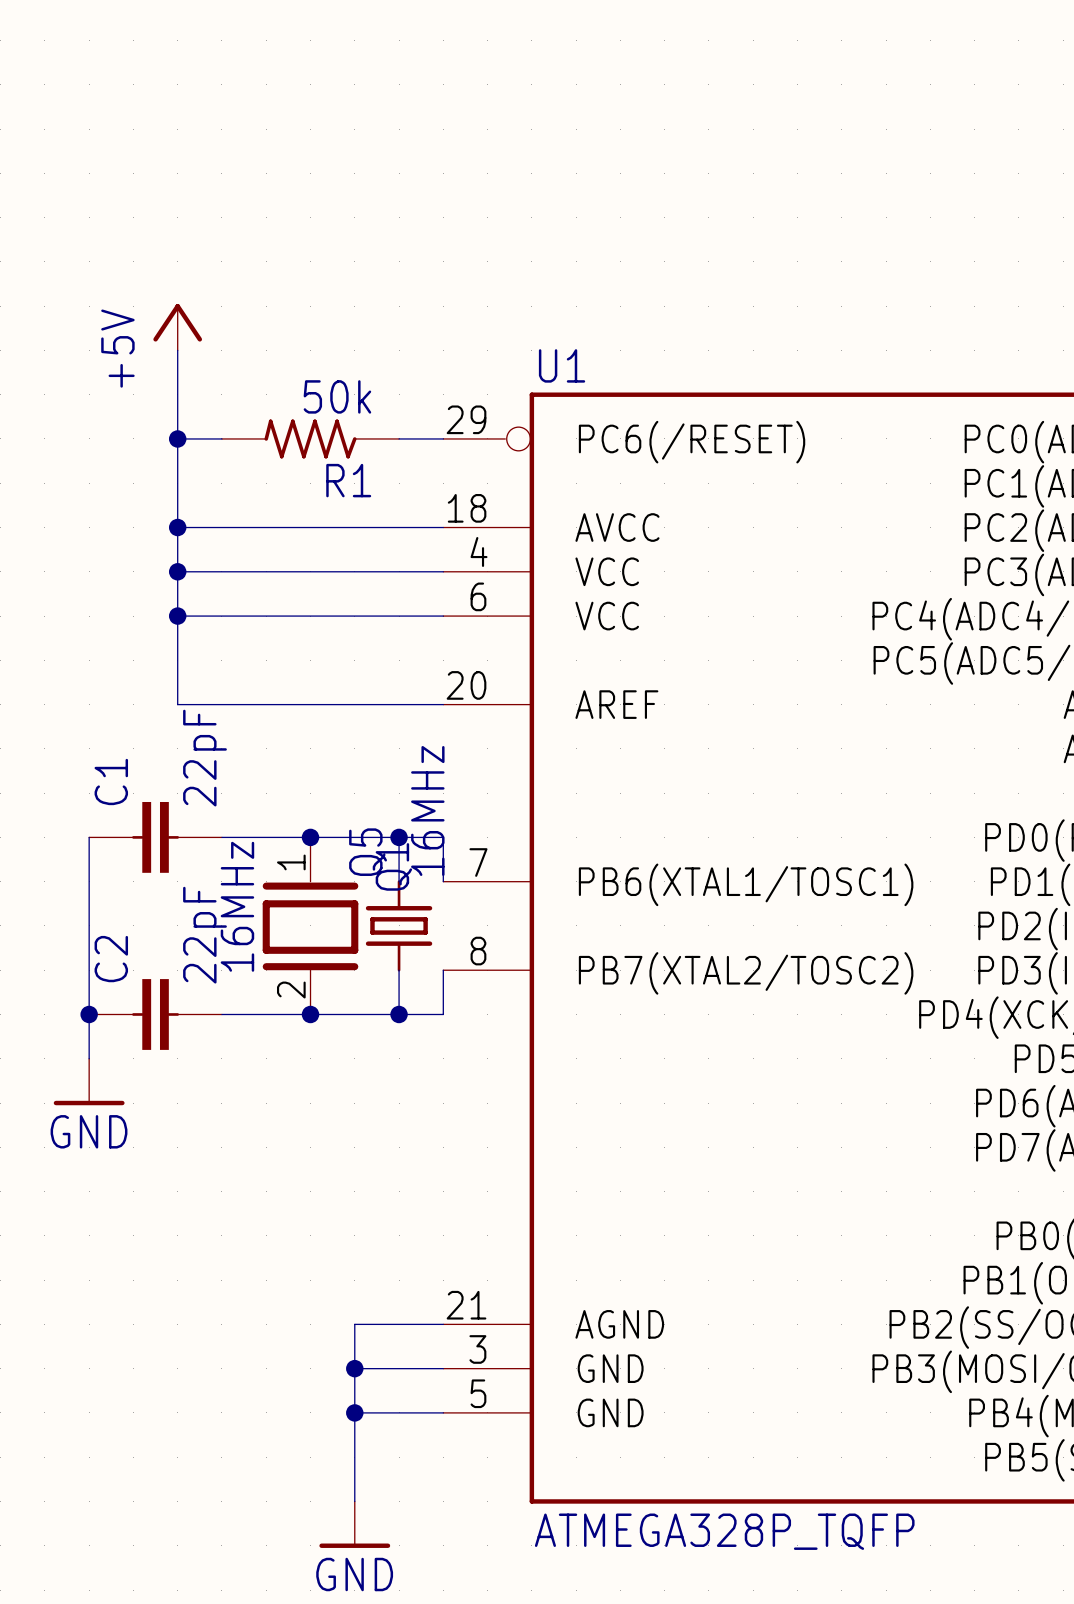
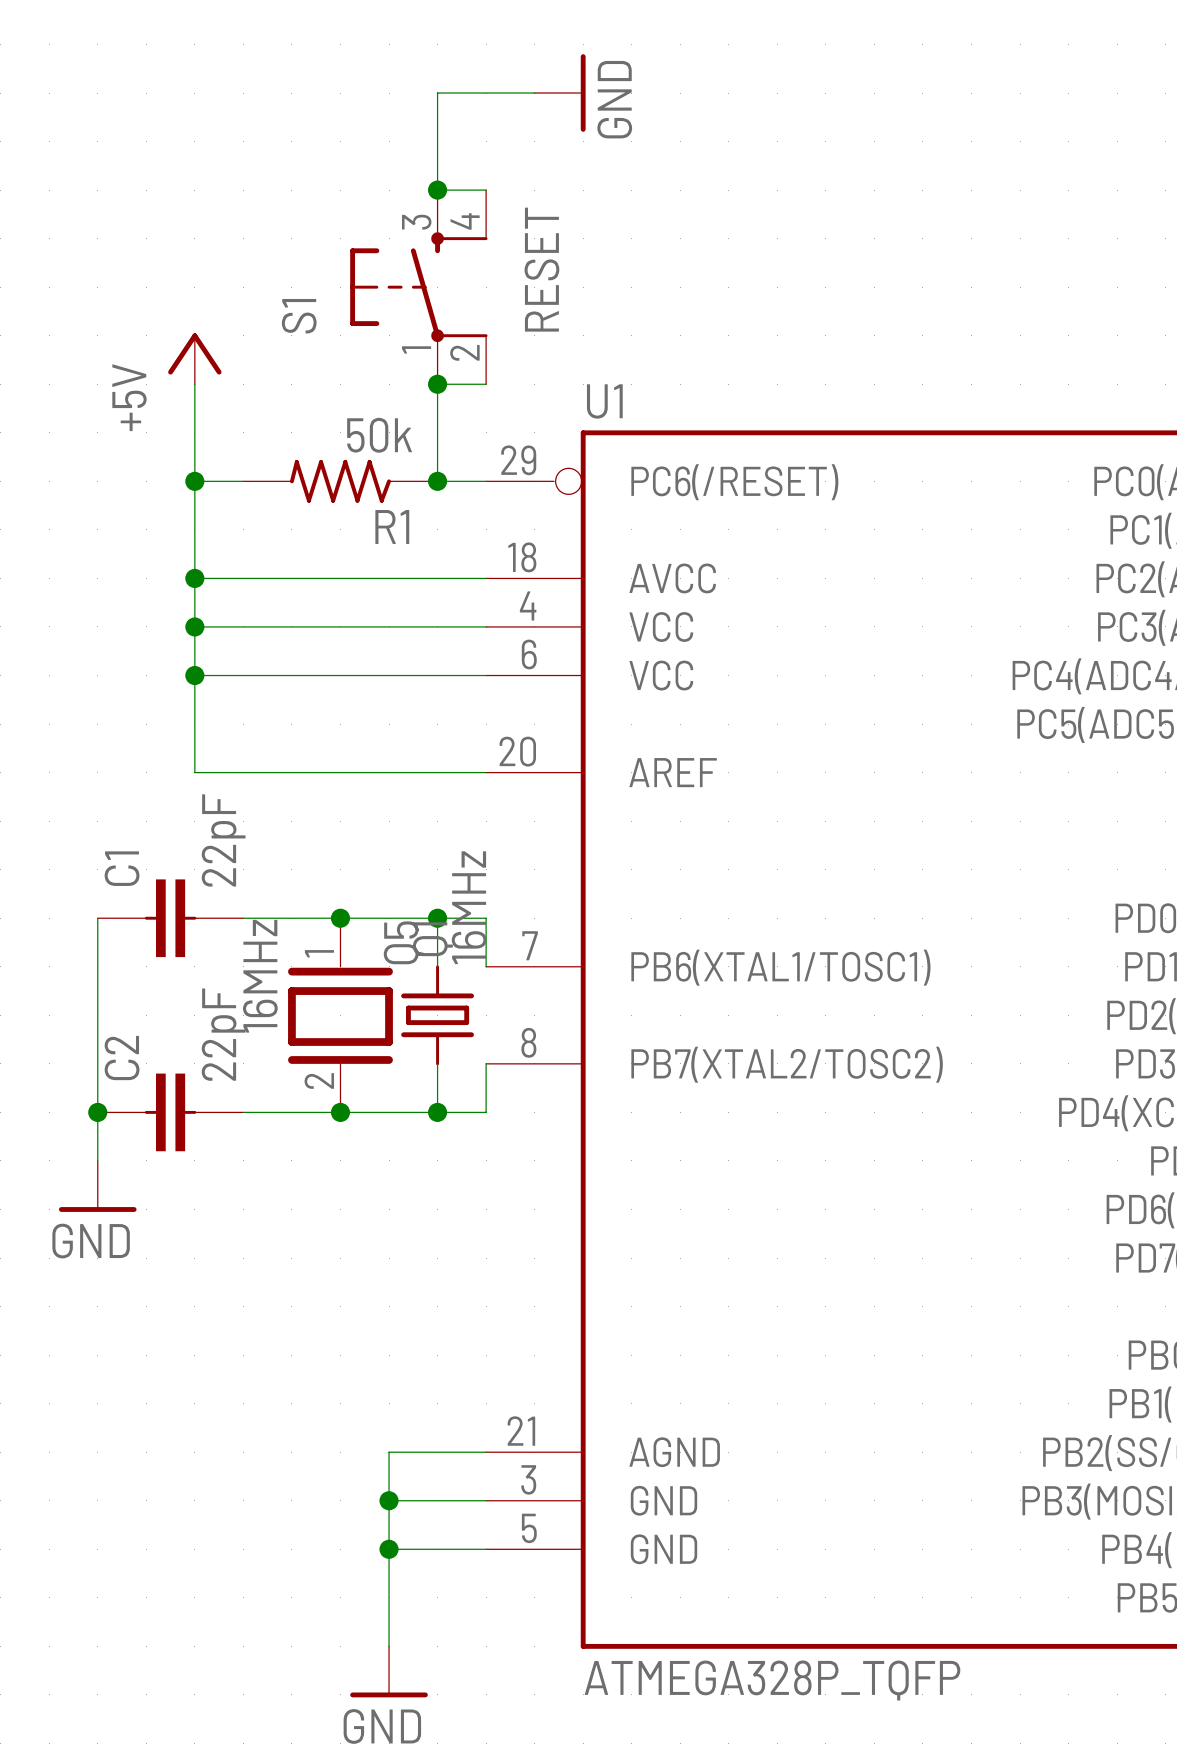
wire: none -> (534, 93) (437, 93) (437, 190) (486, 190)
power symbol: none -> GND (560, 93)
junction: none -> (437, 190)
S1: none -> RESET (418, 287)
junction: none -> (437, 384)
wire: none -> (486, 384) (437, 384) (437, 481)
junction: none -> (437, 481)

